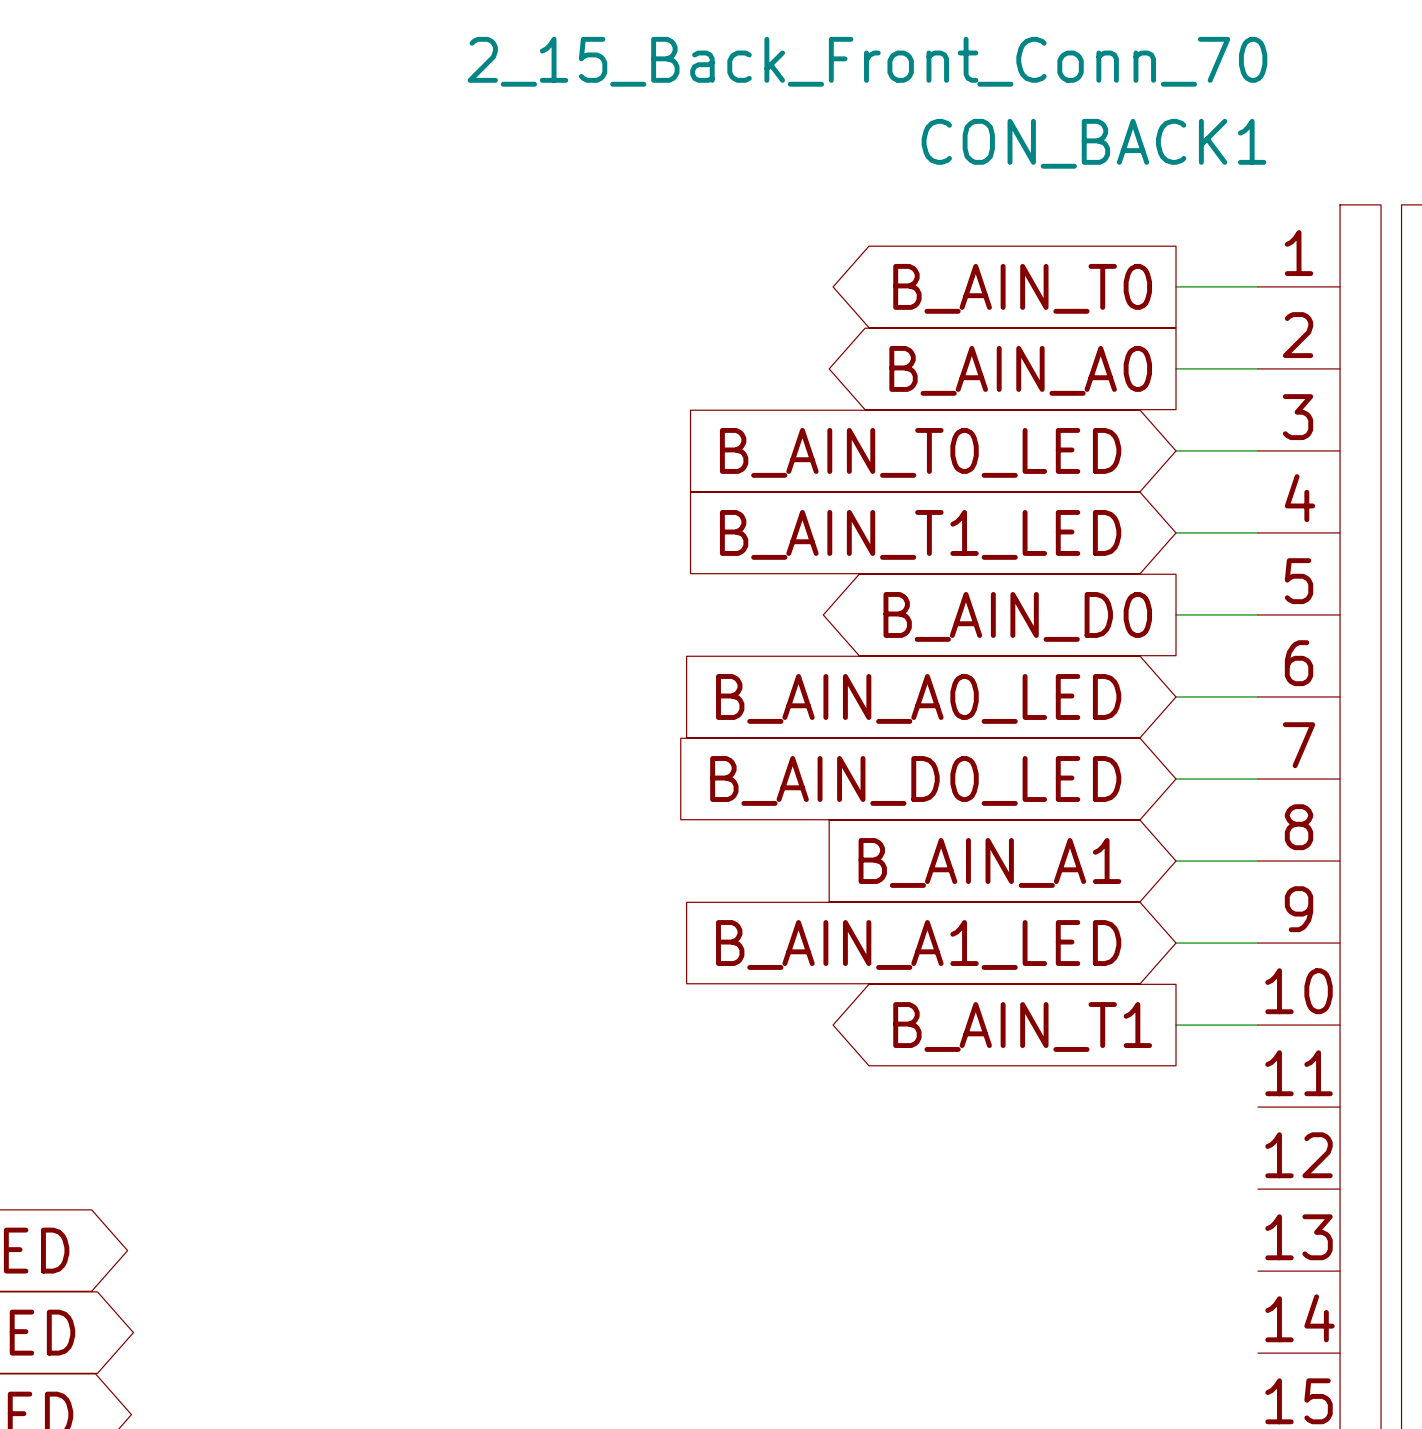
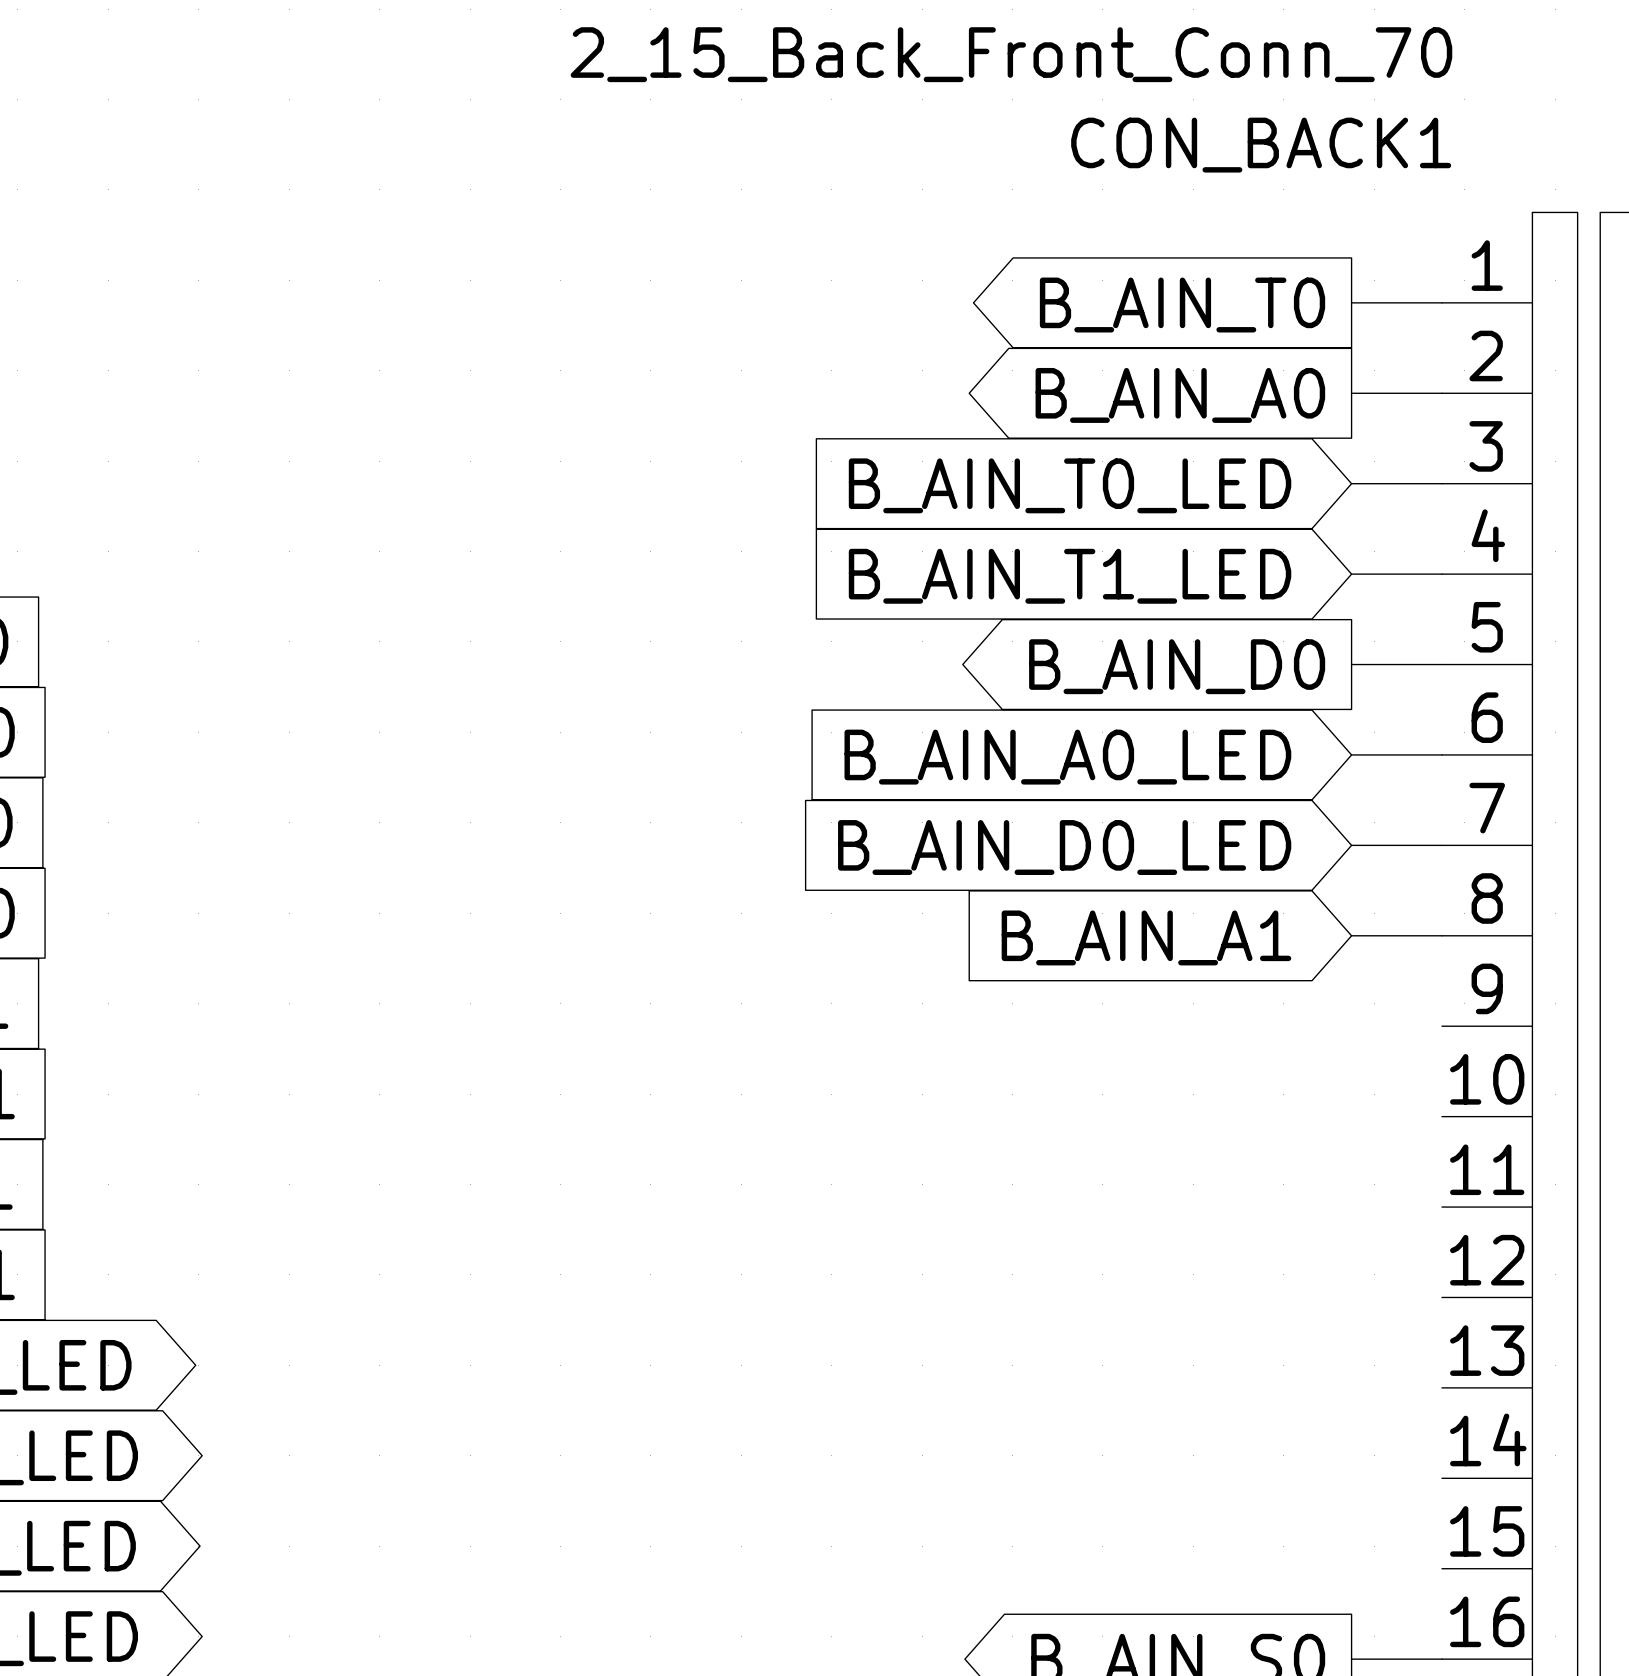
wire: (1175, 943) (1258, 943) -> none
global label: B_AIN_A1_LED (918, 944) -> none
wire: (1175, 1025) (1258, 1025) -> none
global label: B_AIN_T1 (1022, 1027) -> none

